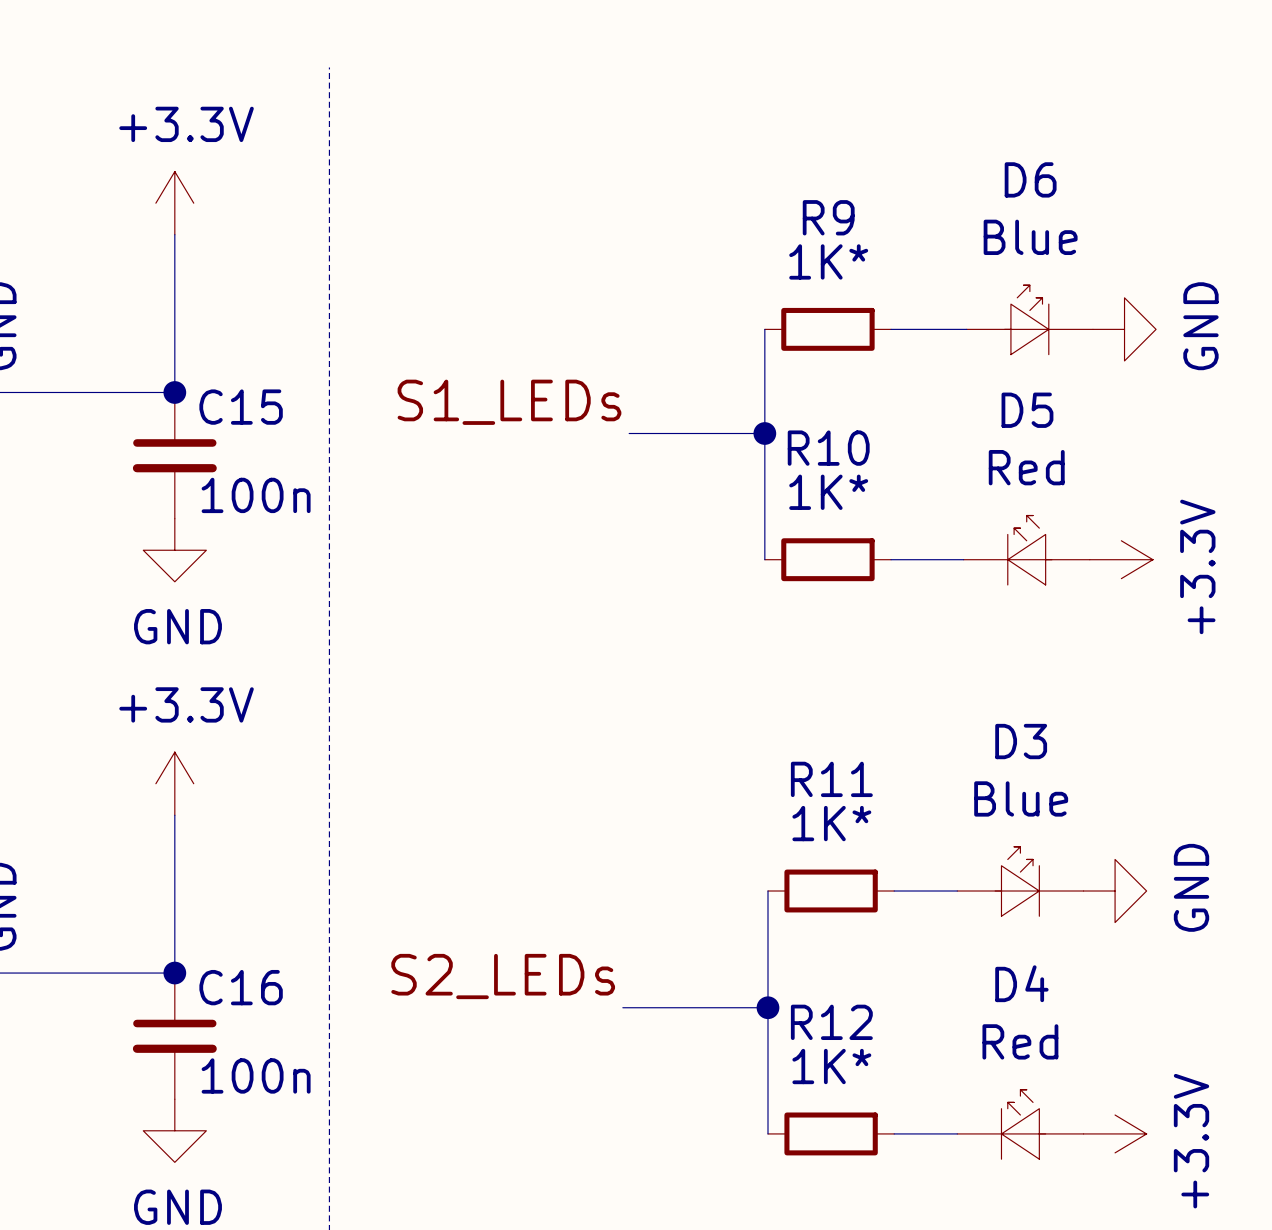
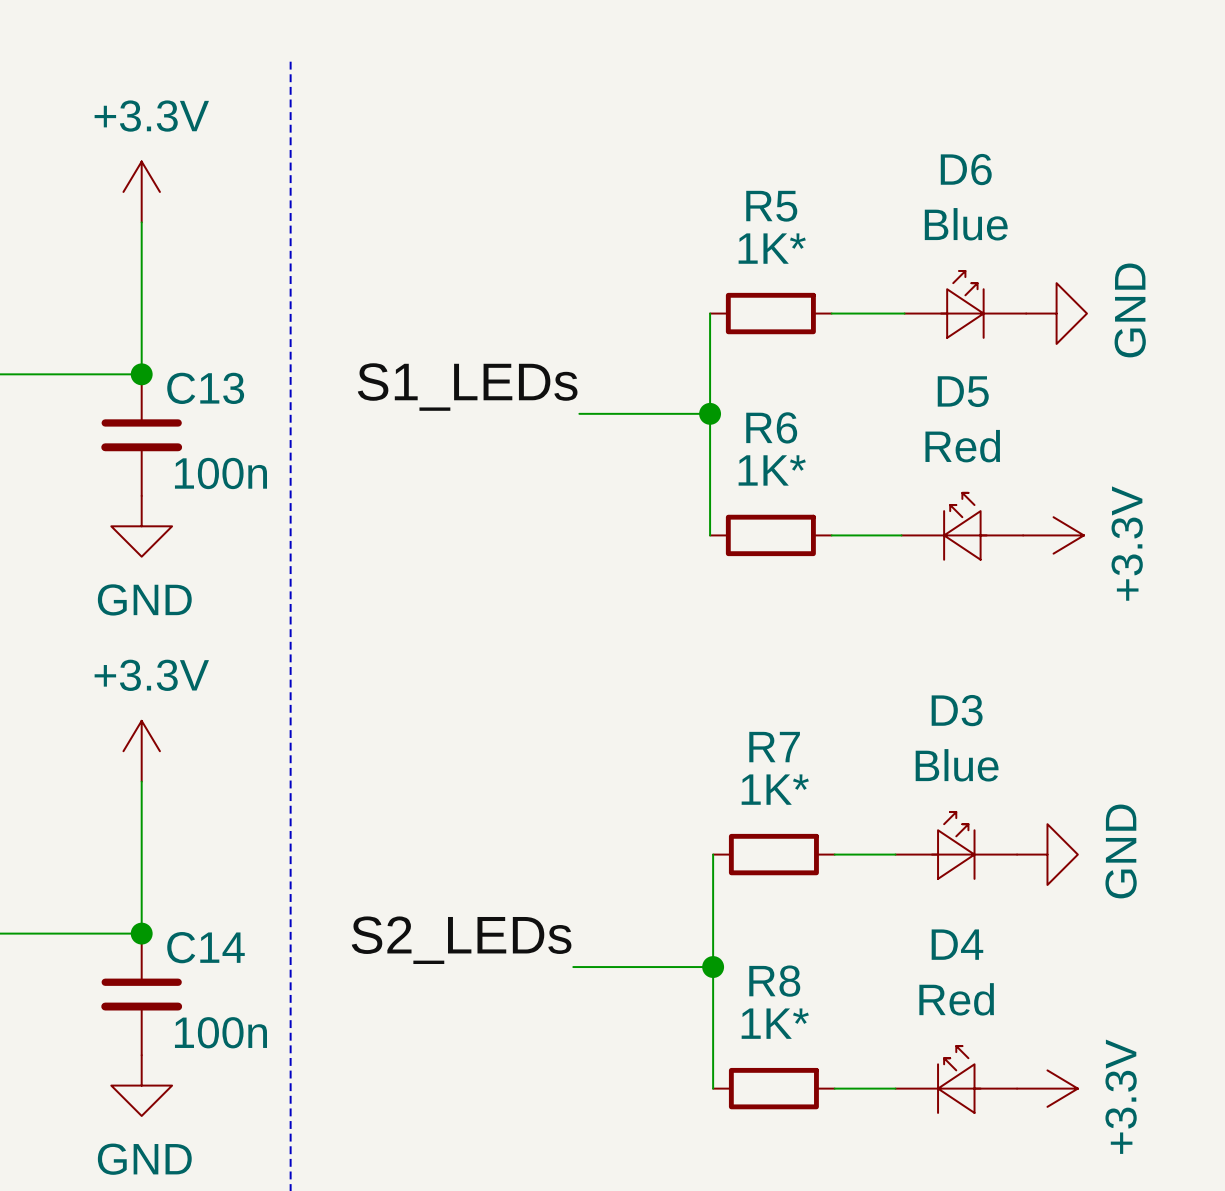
R9 name: R9 (828, 217) -> R5 (771, 206)
C15 name: C15 (241, 407) -> C13 (205, 388)
R10 name: R10 (828, 448) -> R6 (771, 427)
R11 name: R11 (831, 779) -> R7 (774, 747)
C16 name: C16 (241, 987) -> C14 (206, 947)
R12 name: R12 (831, 1022) -> R8 (774, 981)

